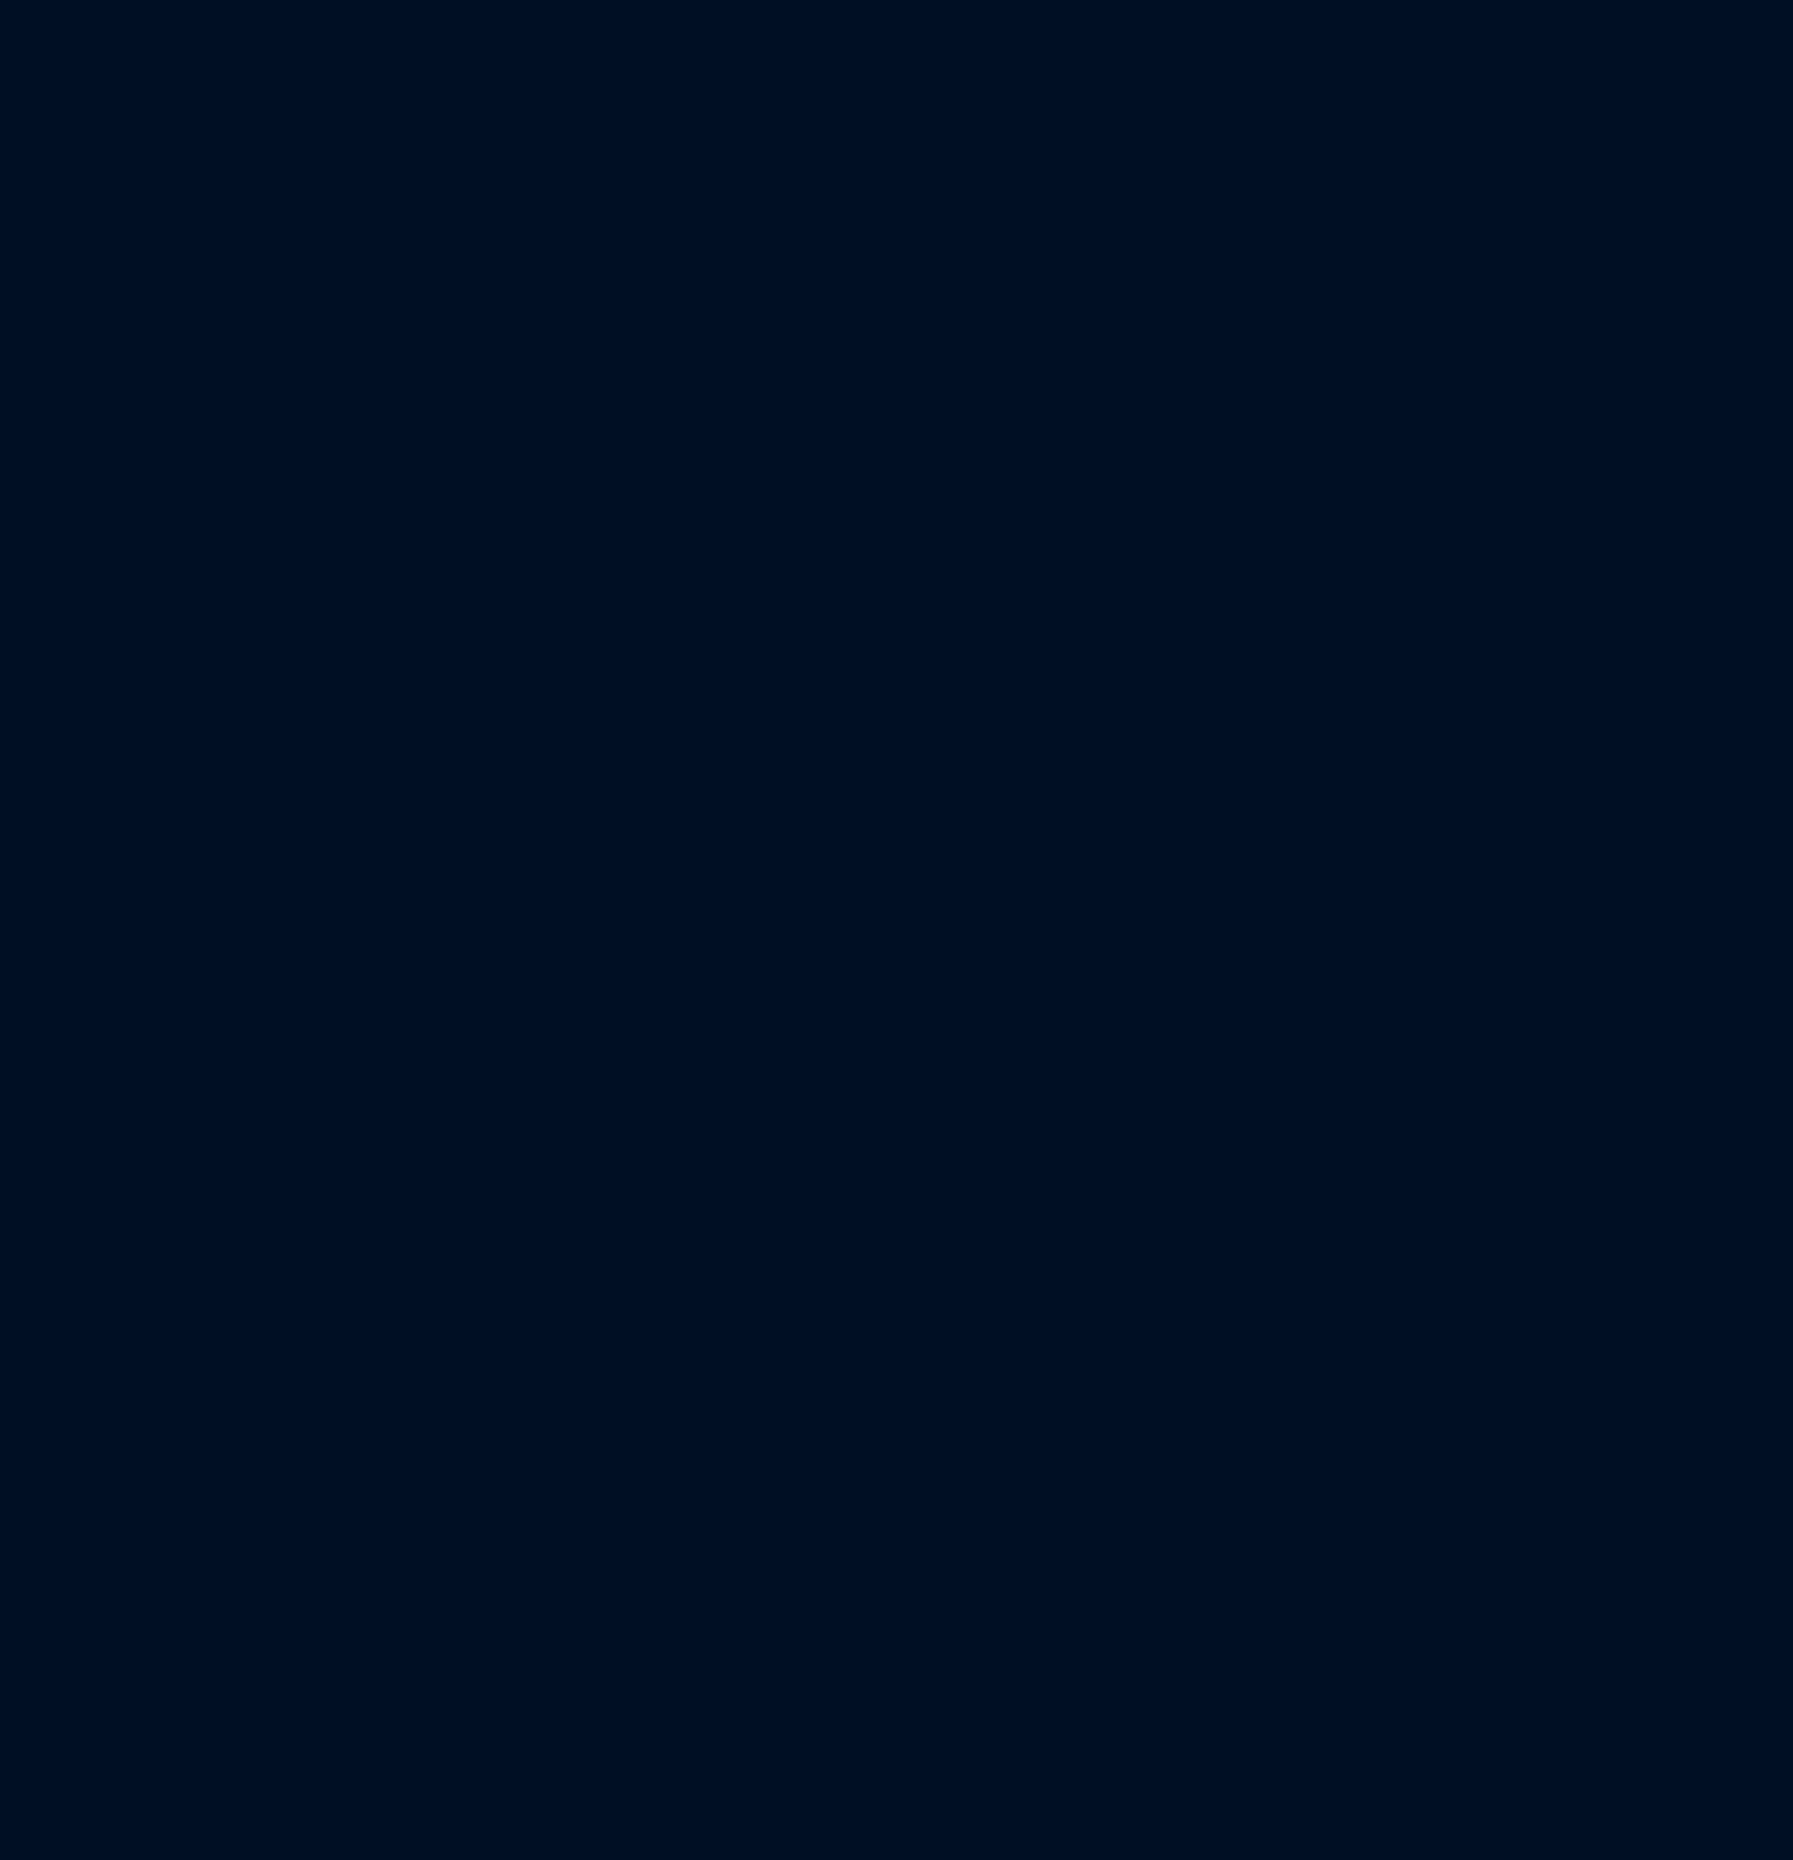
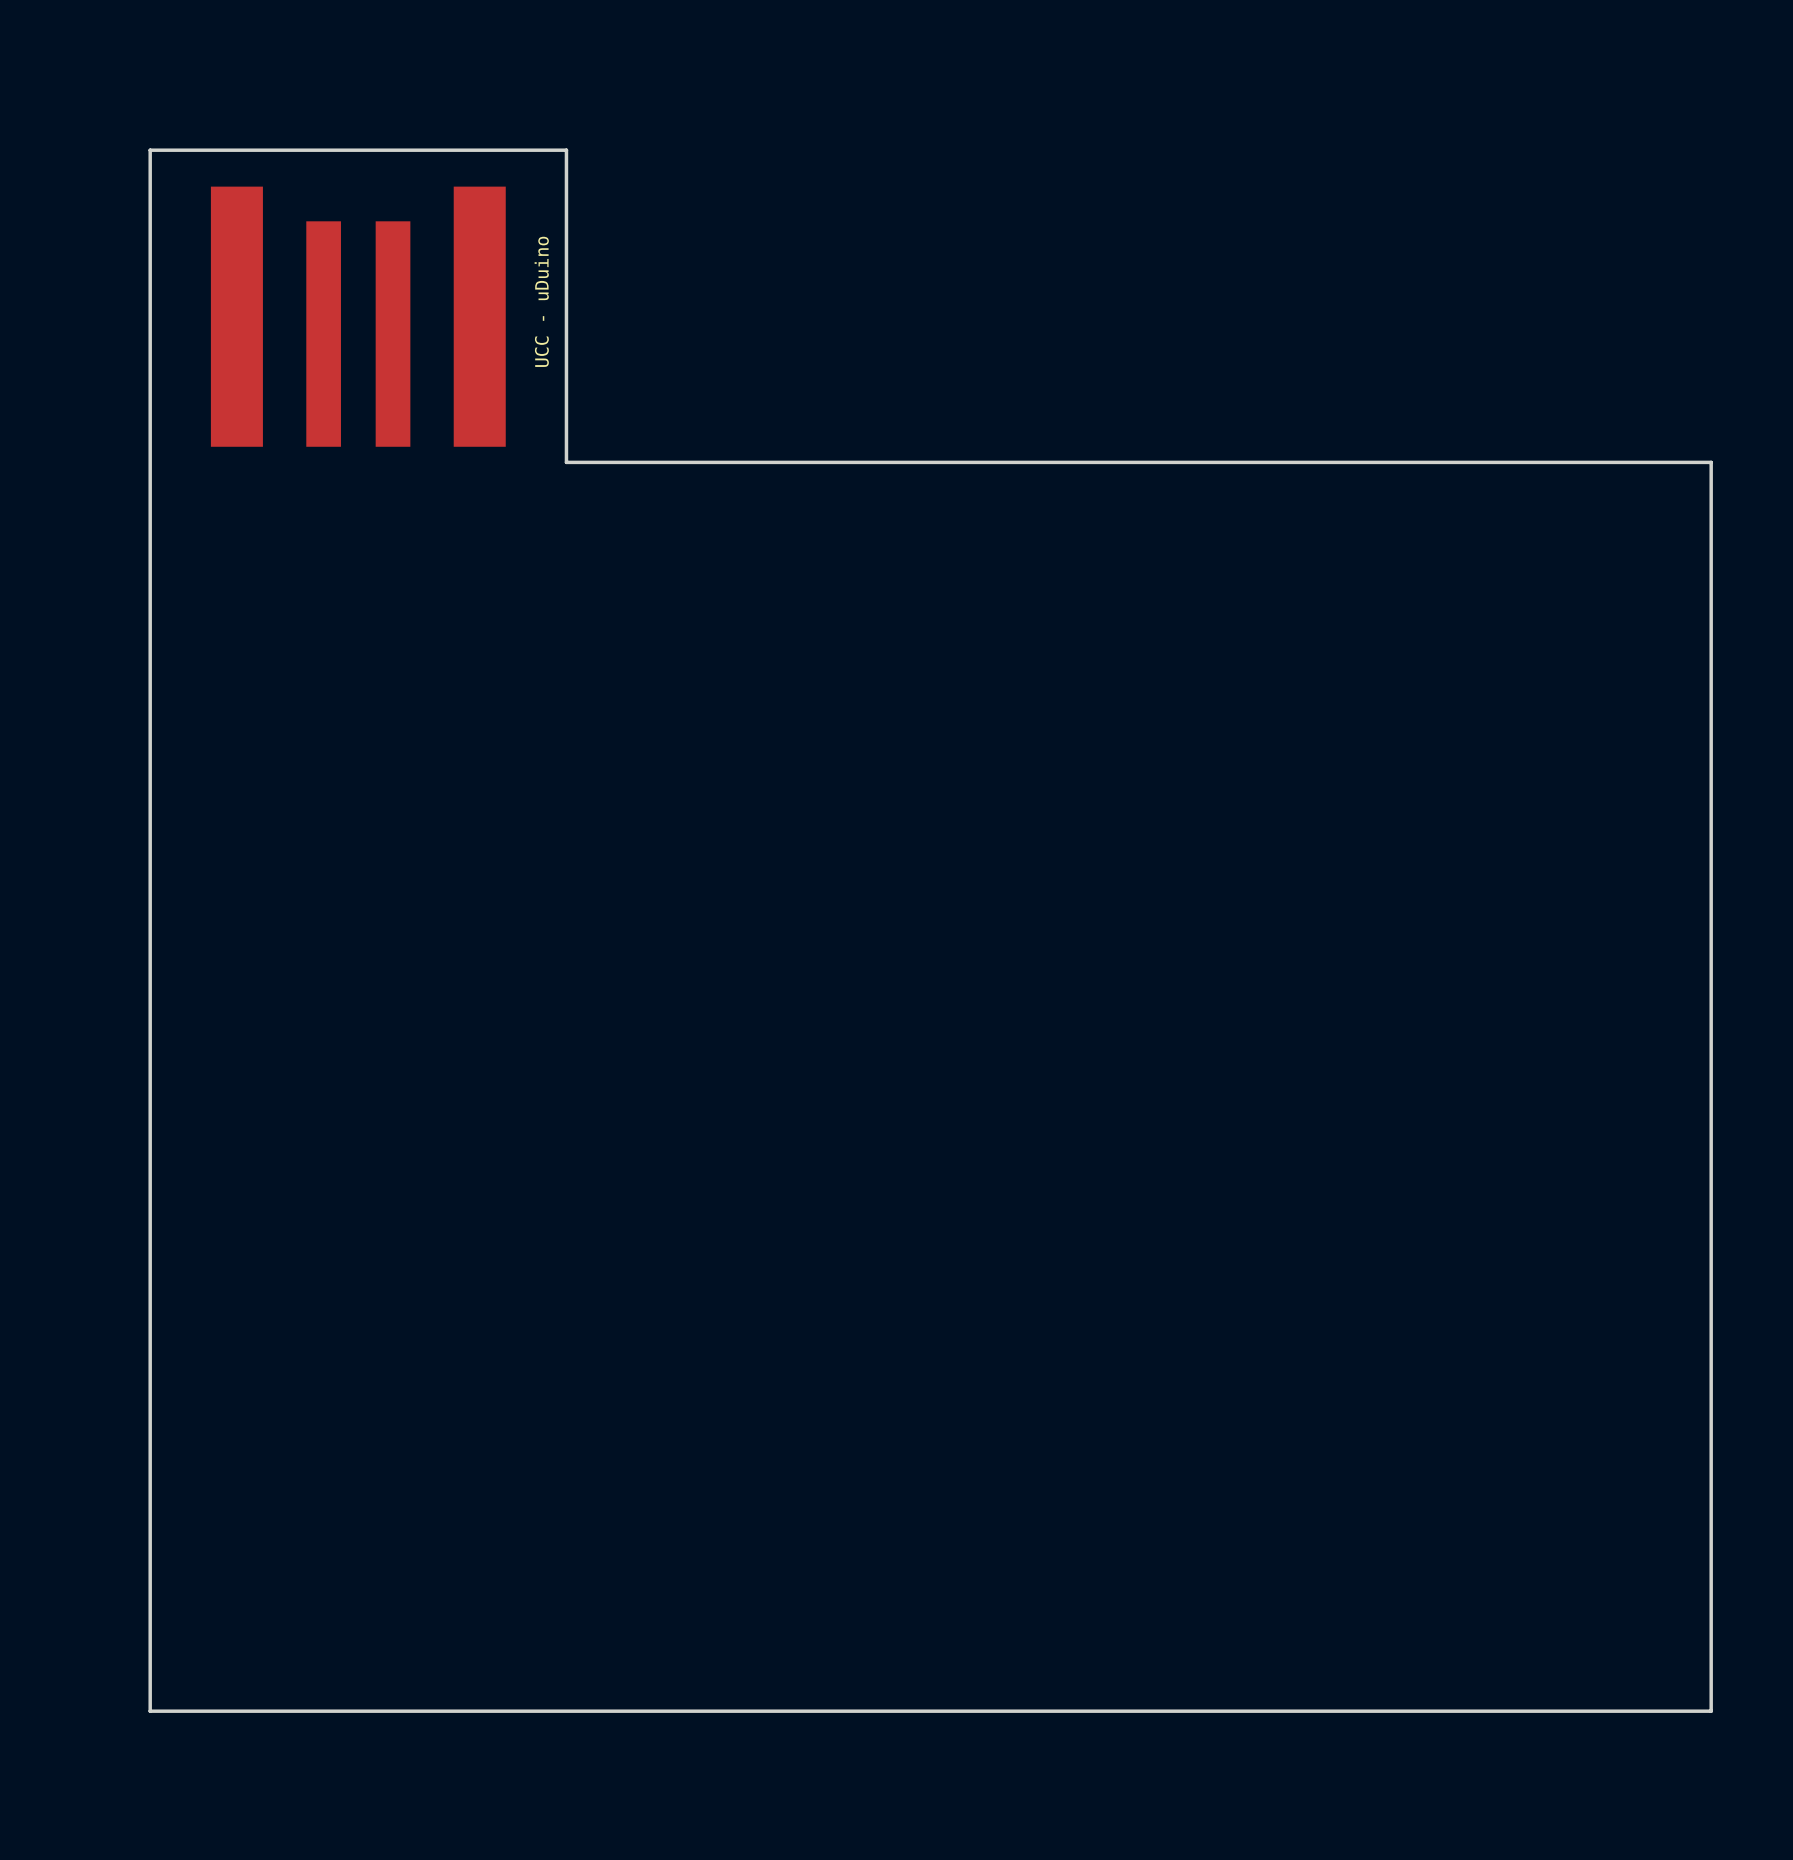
board edge: none -> (150, 150) (150, 1711) (1711, 1711) (1711, 462) (566, 462) (566, 150) (150, 150)
part: none -> (358, 316)

